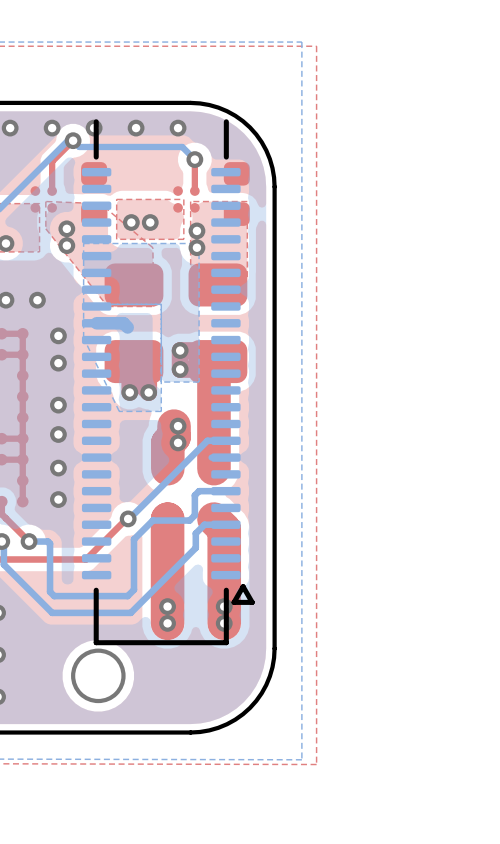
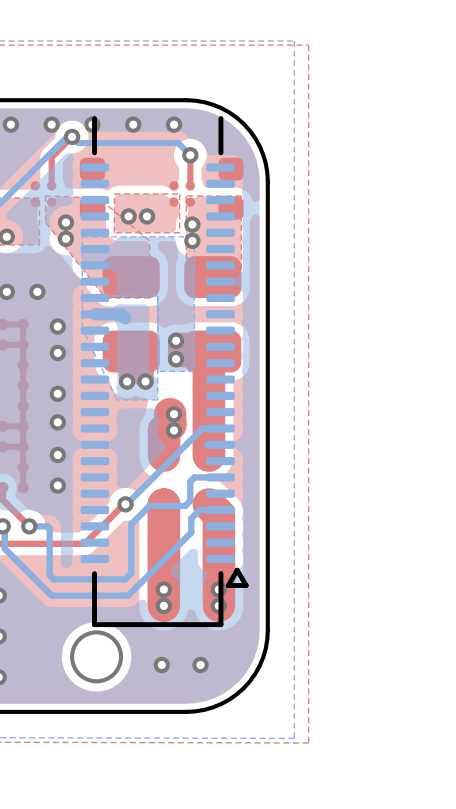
via: none -> (161, 665)
via: none -> (200, 665)

